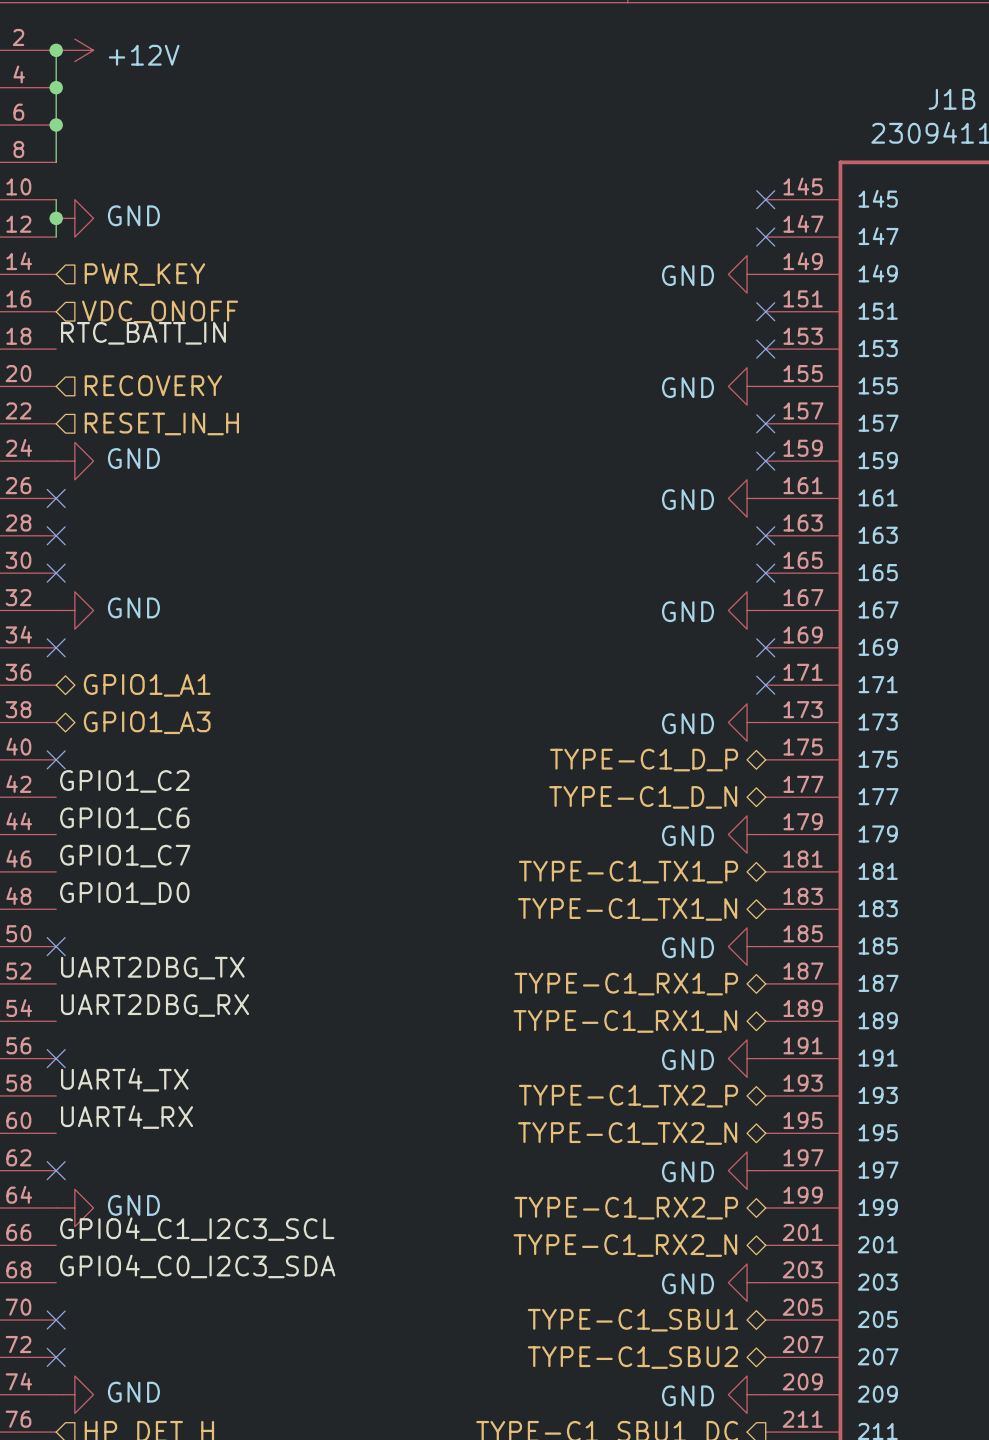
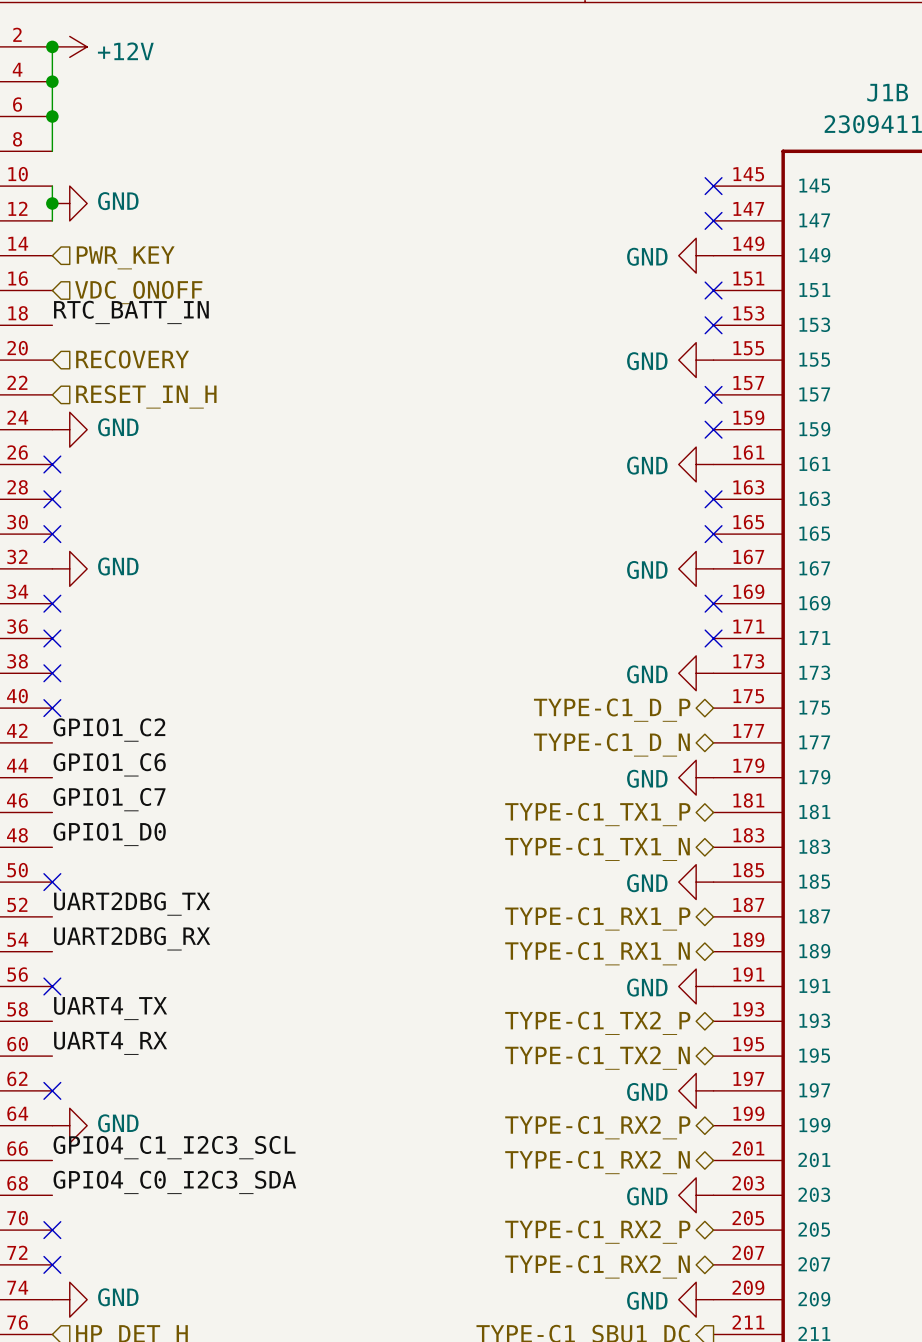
no-connect mark: none -> (52, 638)
hierarchical label: GPIO1_A1 (147, 685) -> none
no-connect mark: none -> (52, 673)
hierarchical label: GPIO1_A3 (147, 722) -> none
hierarchical label: TYPE-C1_SBU1 (632, 1320) -> TYPE-C1_RX2_P (597, 1232)
hierarchical label: TYPE-C1_SBU2 (632, 1357) -> TYPE-C1_RX2_N (597, 1266)

